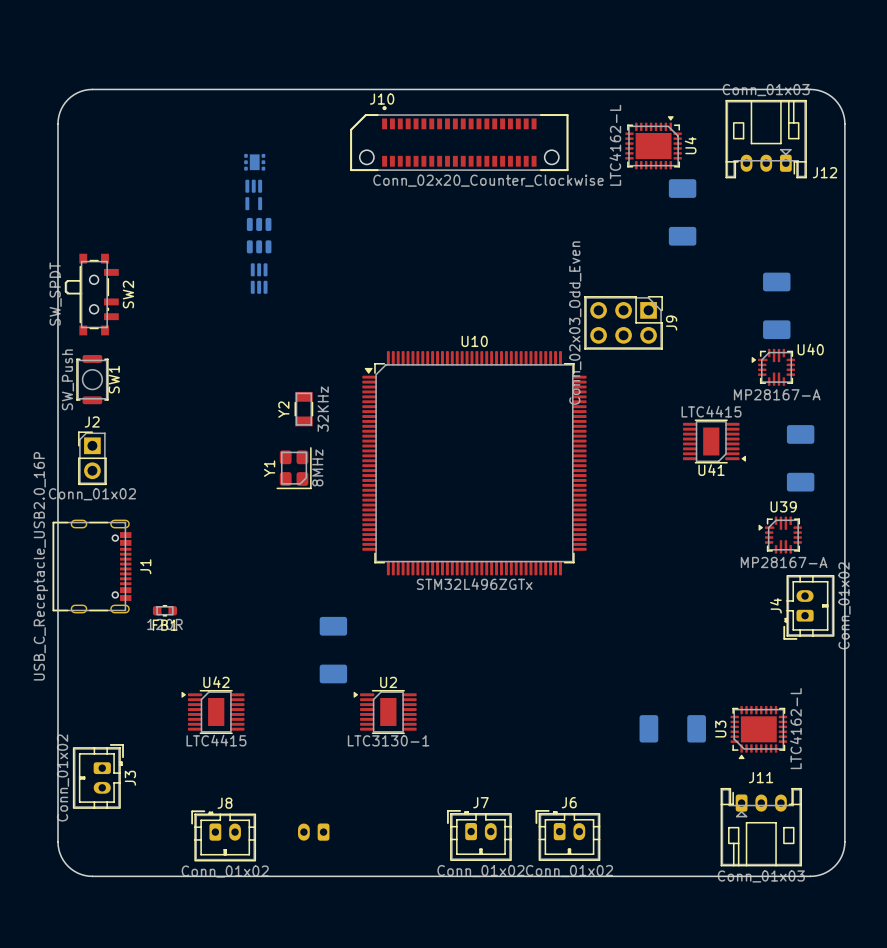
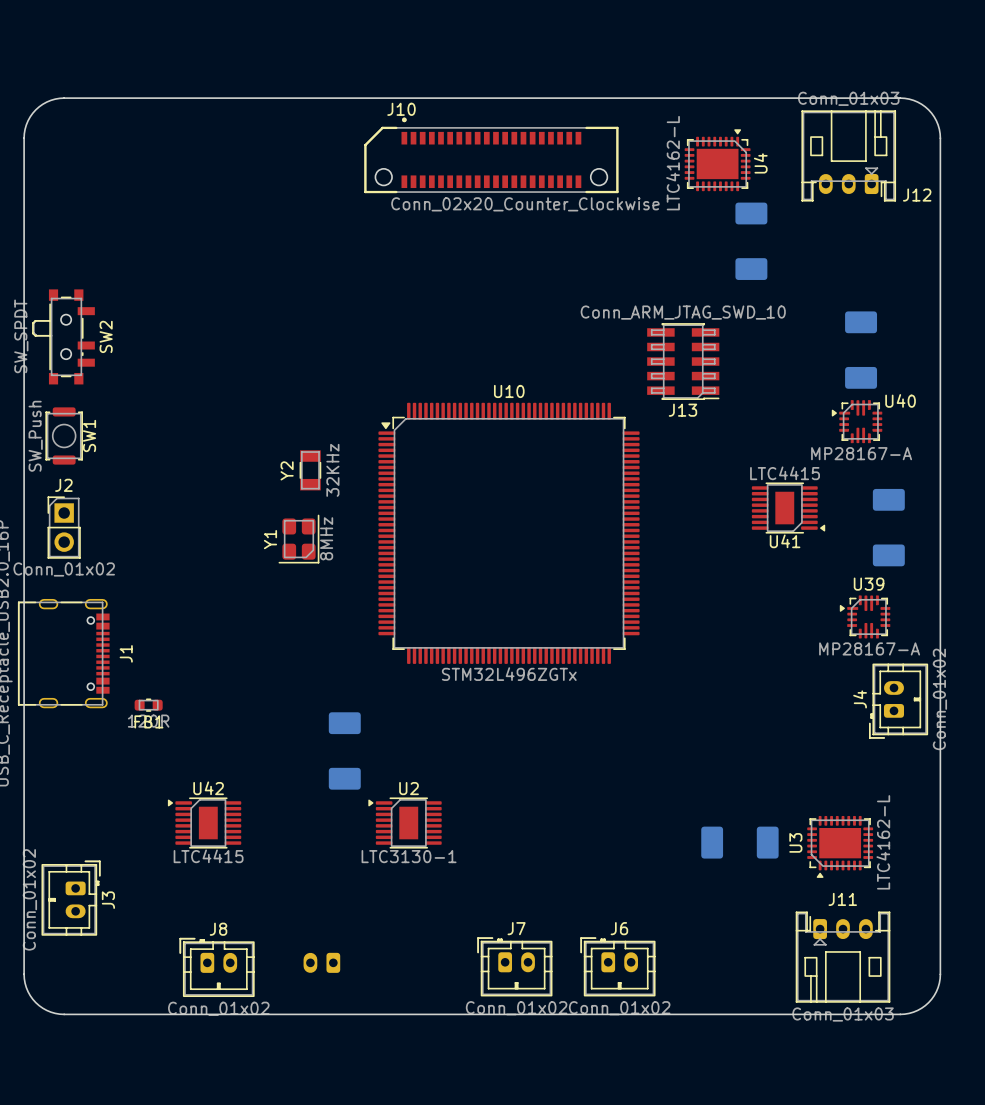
part: (254, 162) -> none
part: (253, 194) -> none
part: (259, 235) -> none
part: (259, 278) -> none
J13: none -> Conn_ARM_JTAG_SWD_10 (683, 361)
J9: Conn_02x03_Odd_Even (623, 322) -> none

